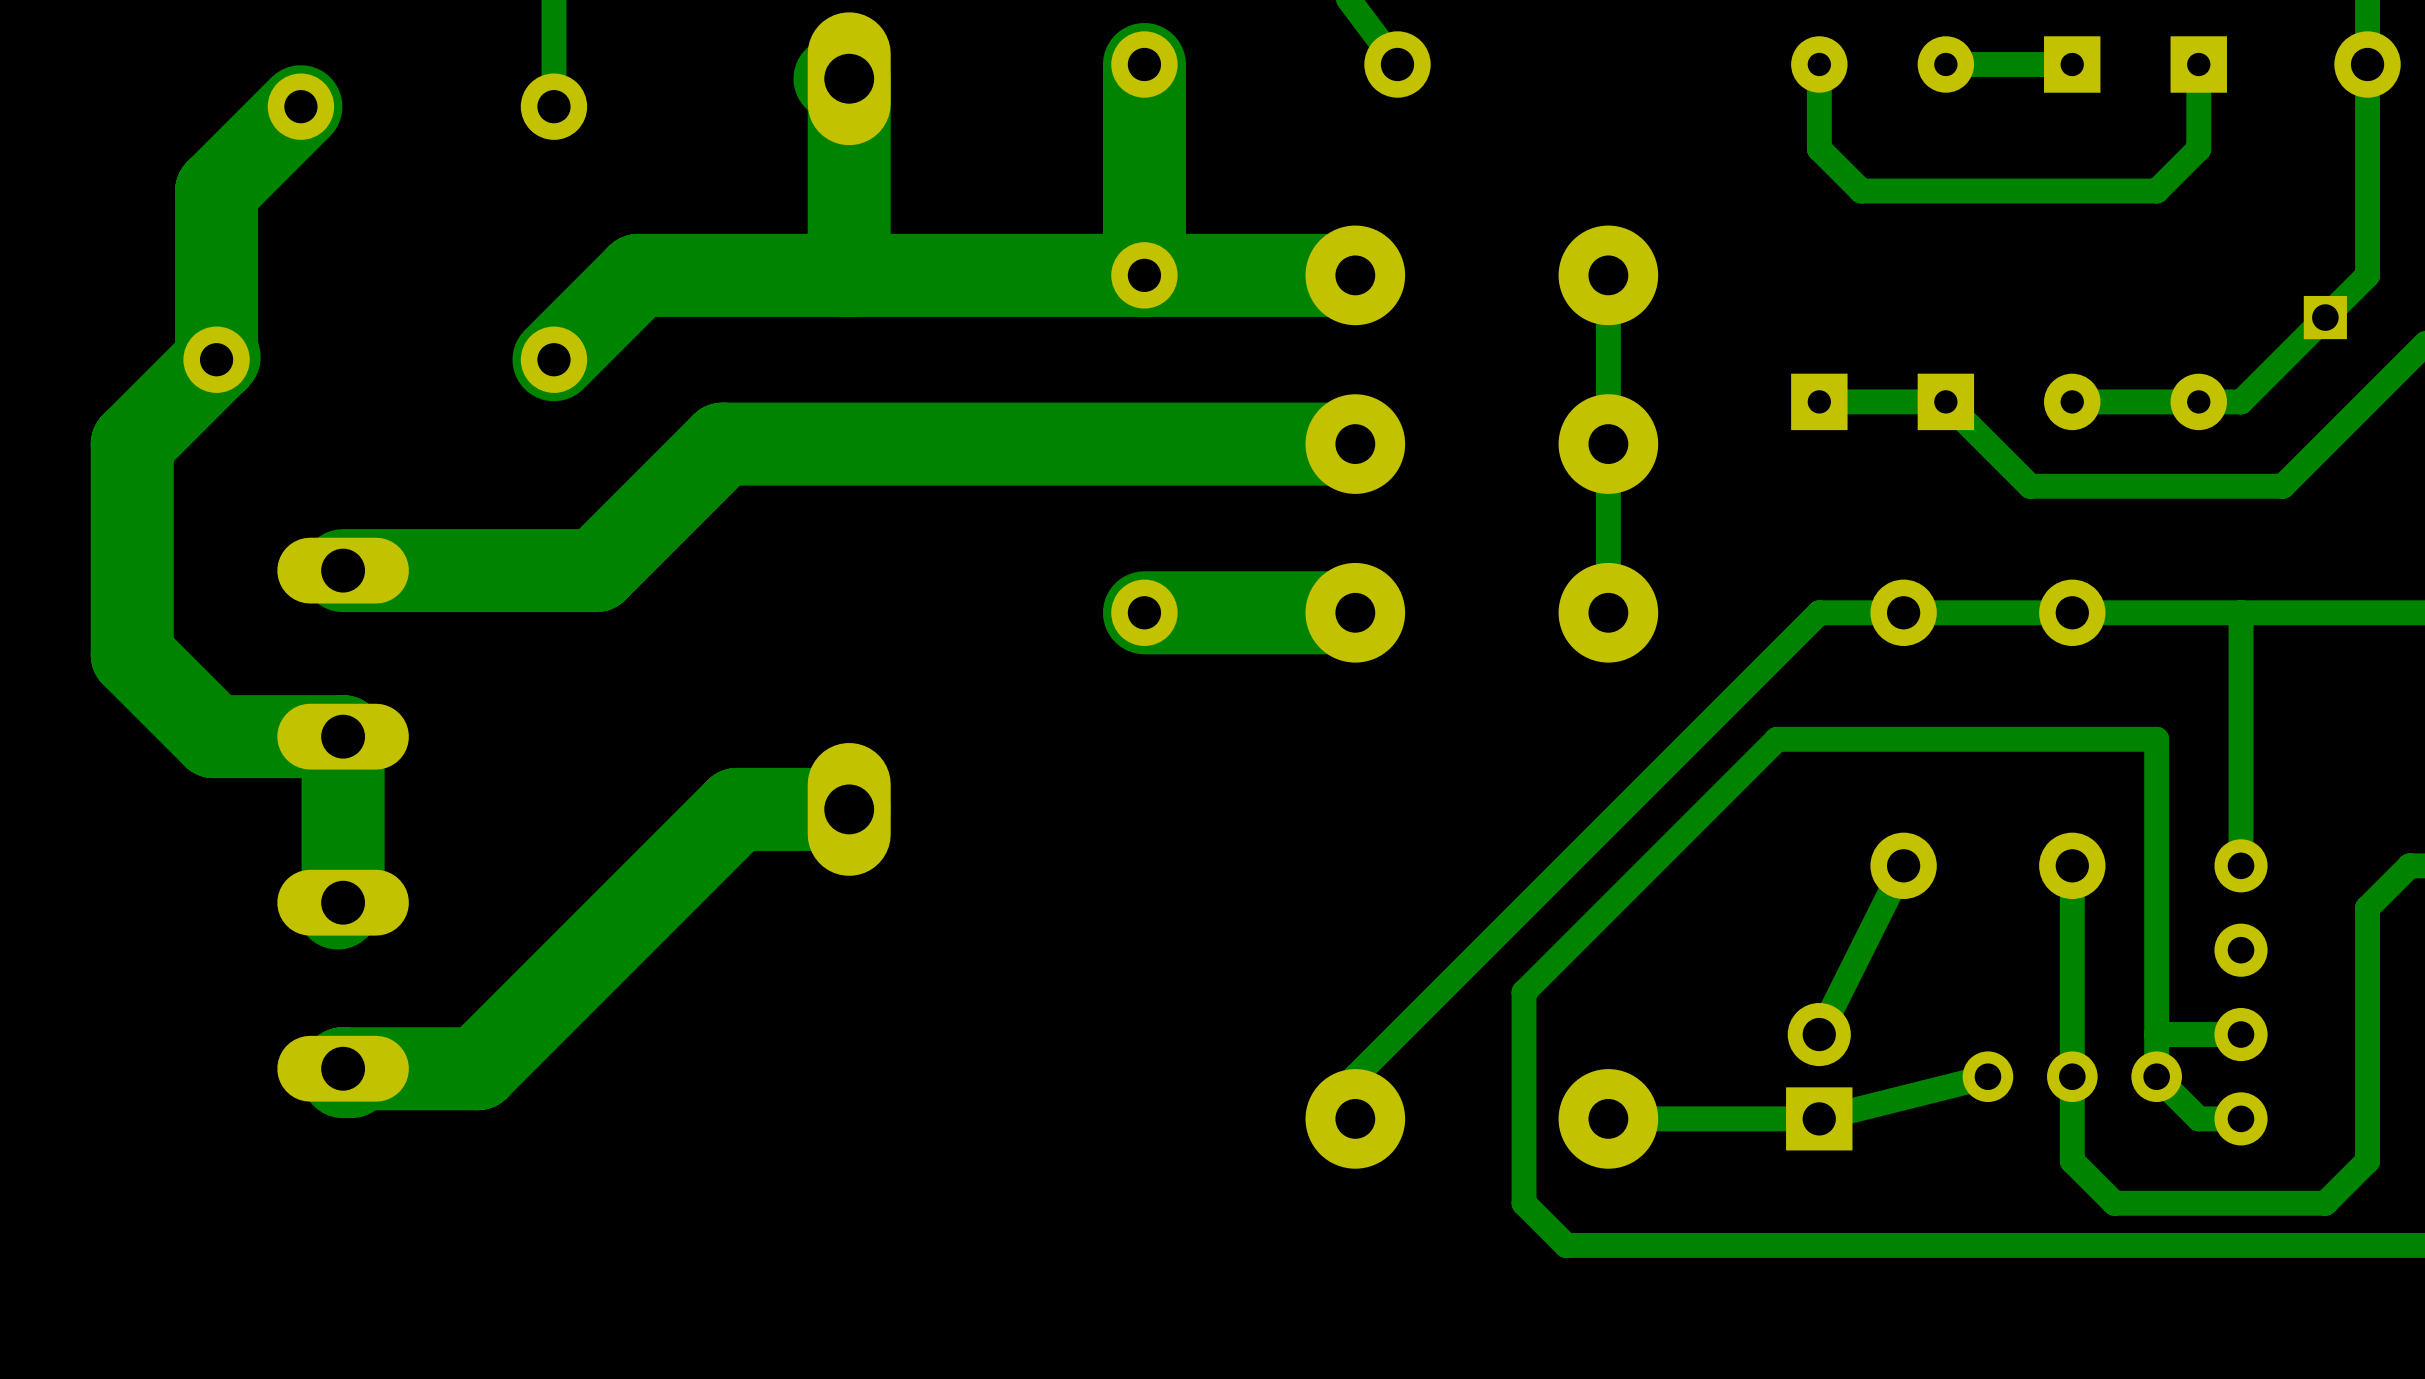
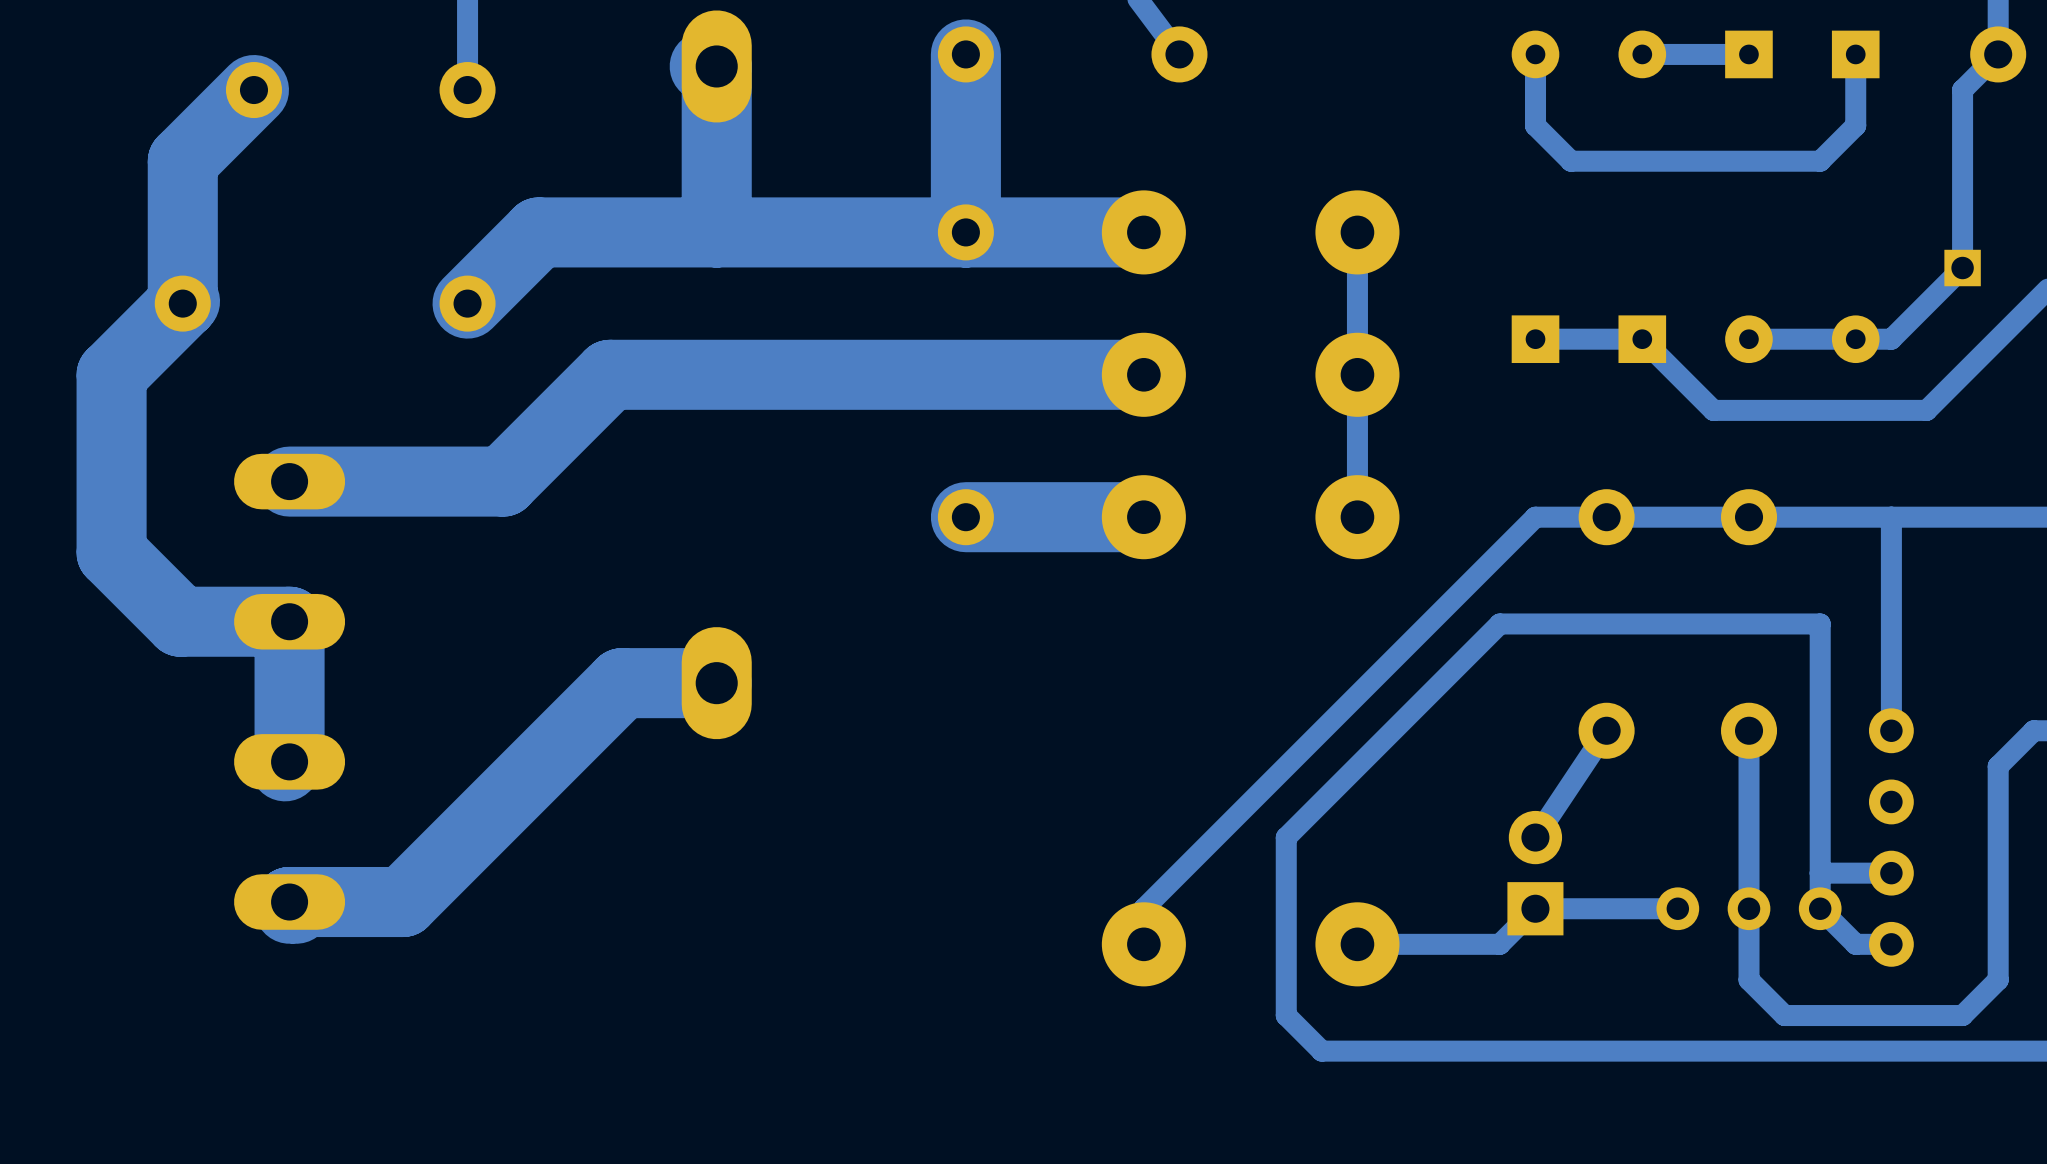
bottom track: (2367, 64) (2367, 275) (2325, 317) -> (1998, 54) (1962, 90) (1962, 268)
bottom track: (1903, 865) (1819, 1034) -> (1606, 730) (1535, 837)
part position: (1819, 1076) -> (1535, 873)
bottom track: (1987, 1076) (1819, 1118) (1777, 1118) -> (1677, 908) (1535, 908) (1499, 944)

